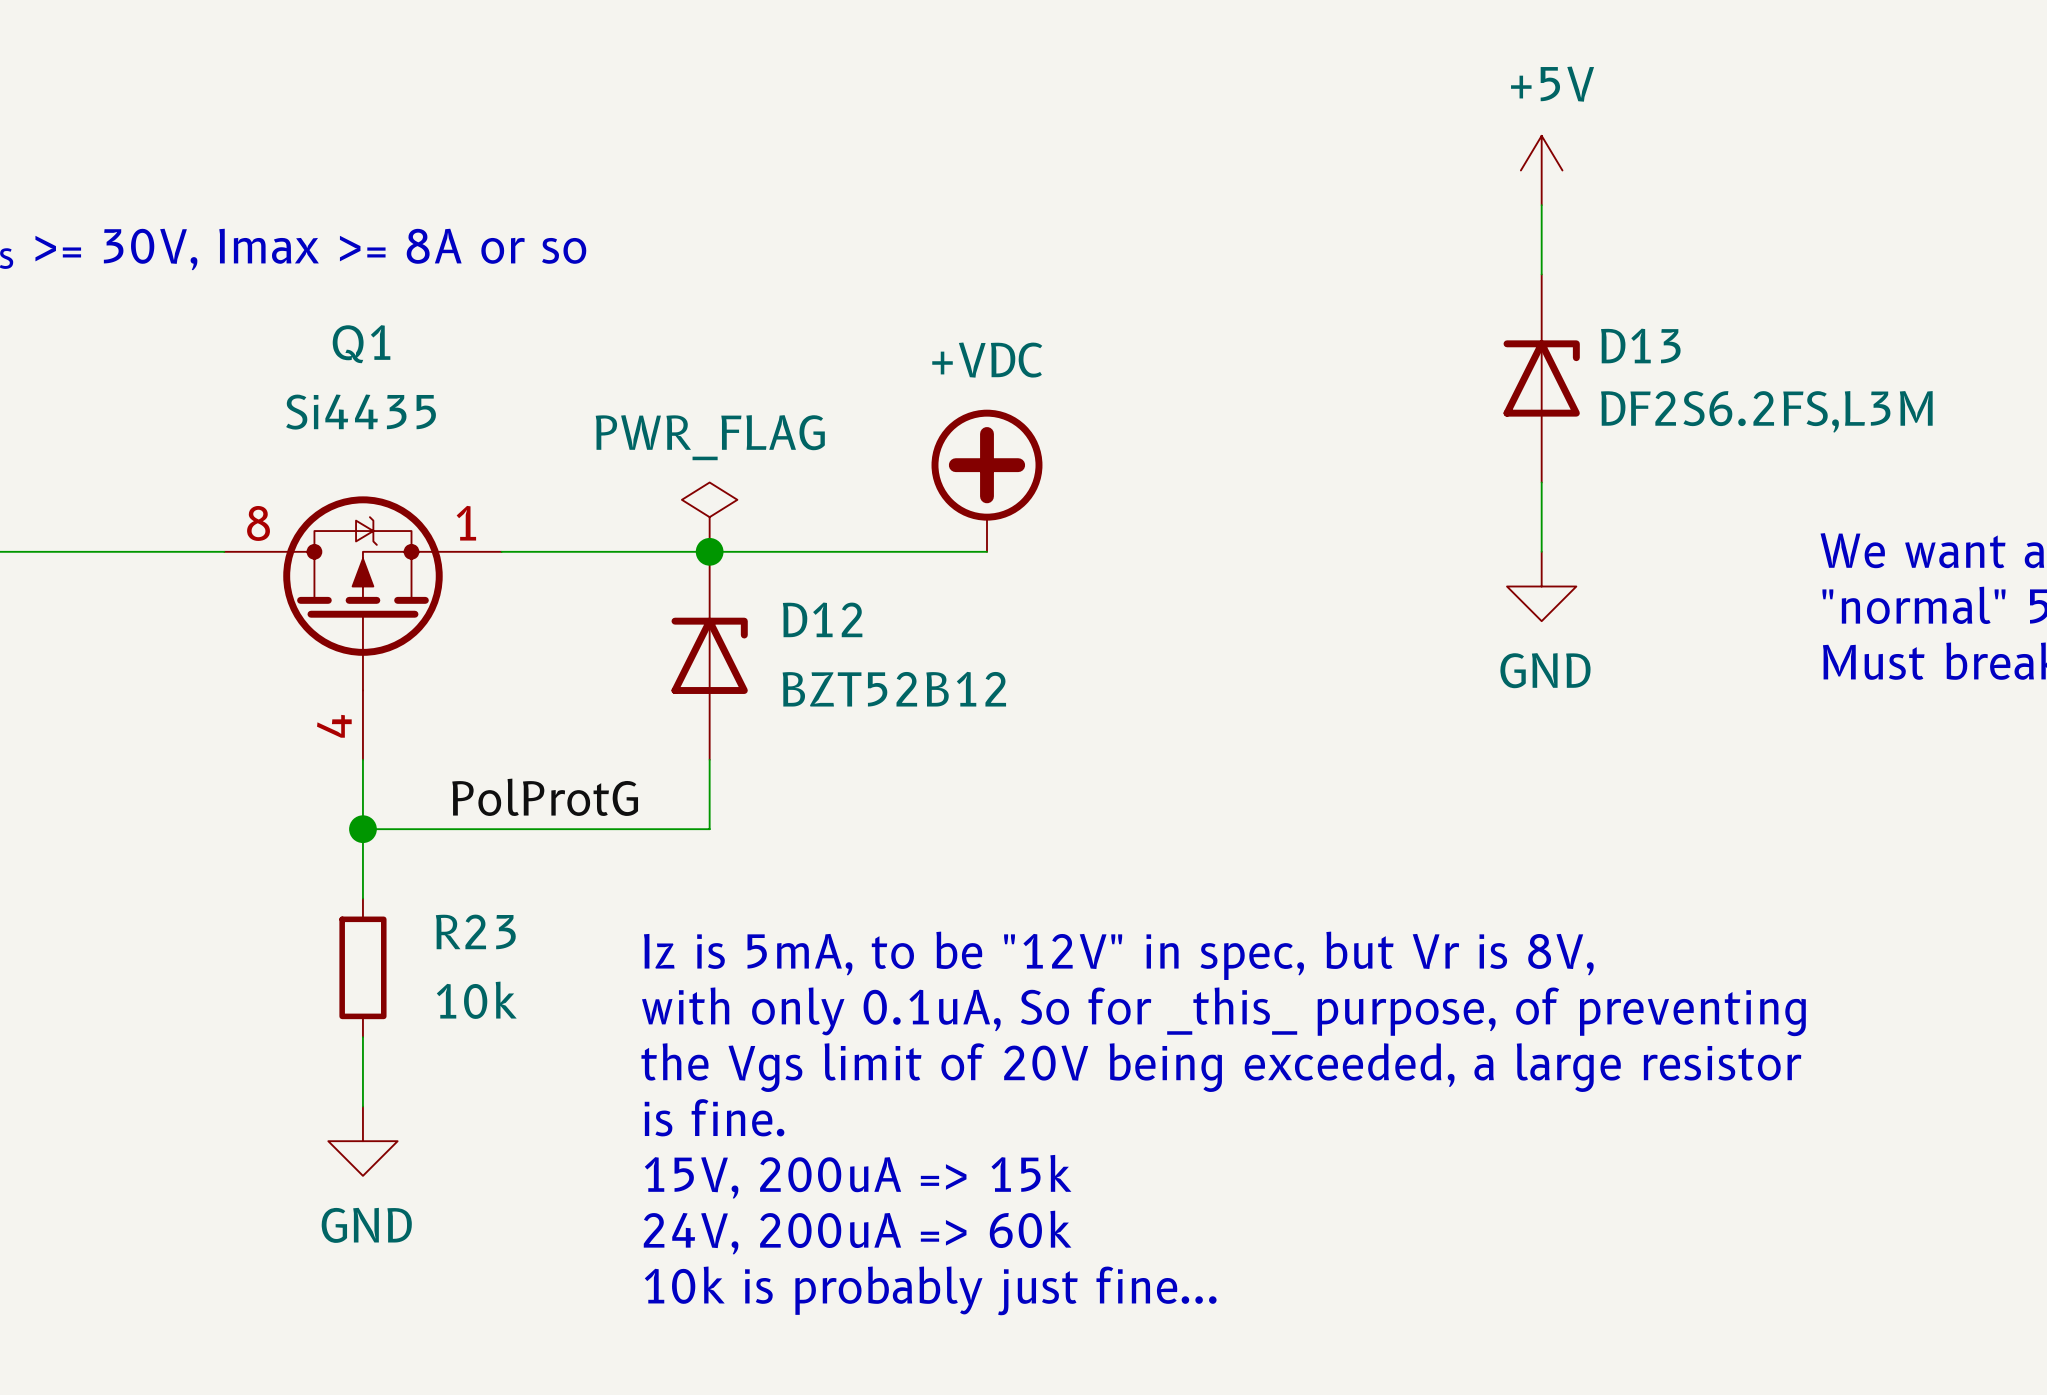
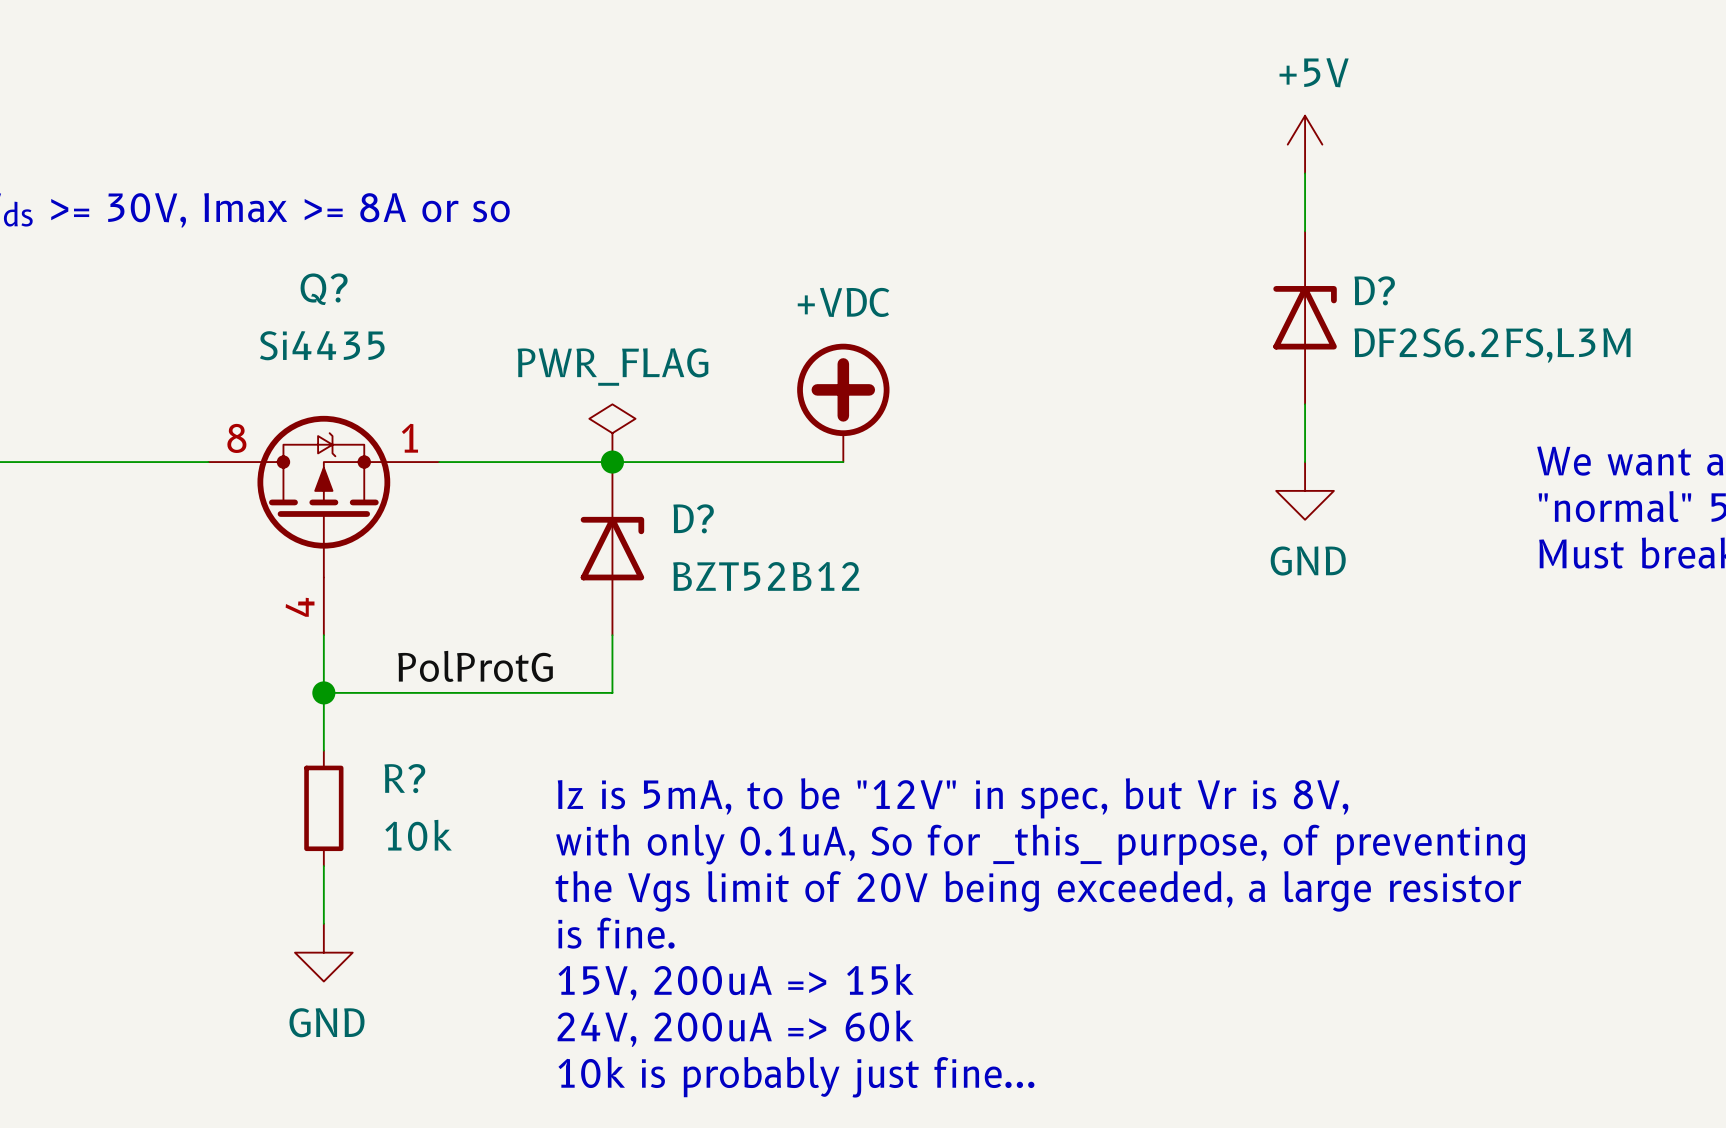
Q1 name: Q1 (361, 344) -> Q? (324, 289)
D13 name: D13 (1640, 345) -> D? (1374, 290)
D12 name: D12 (822, 619) -> D? (693, 518)
R23 name: R23 (475, 931) -> R? (404, 778)

